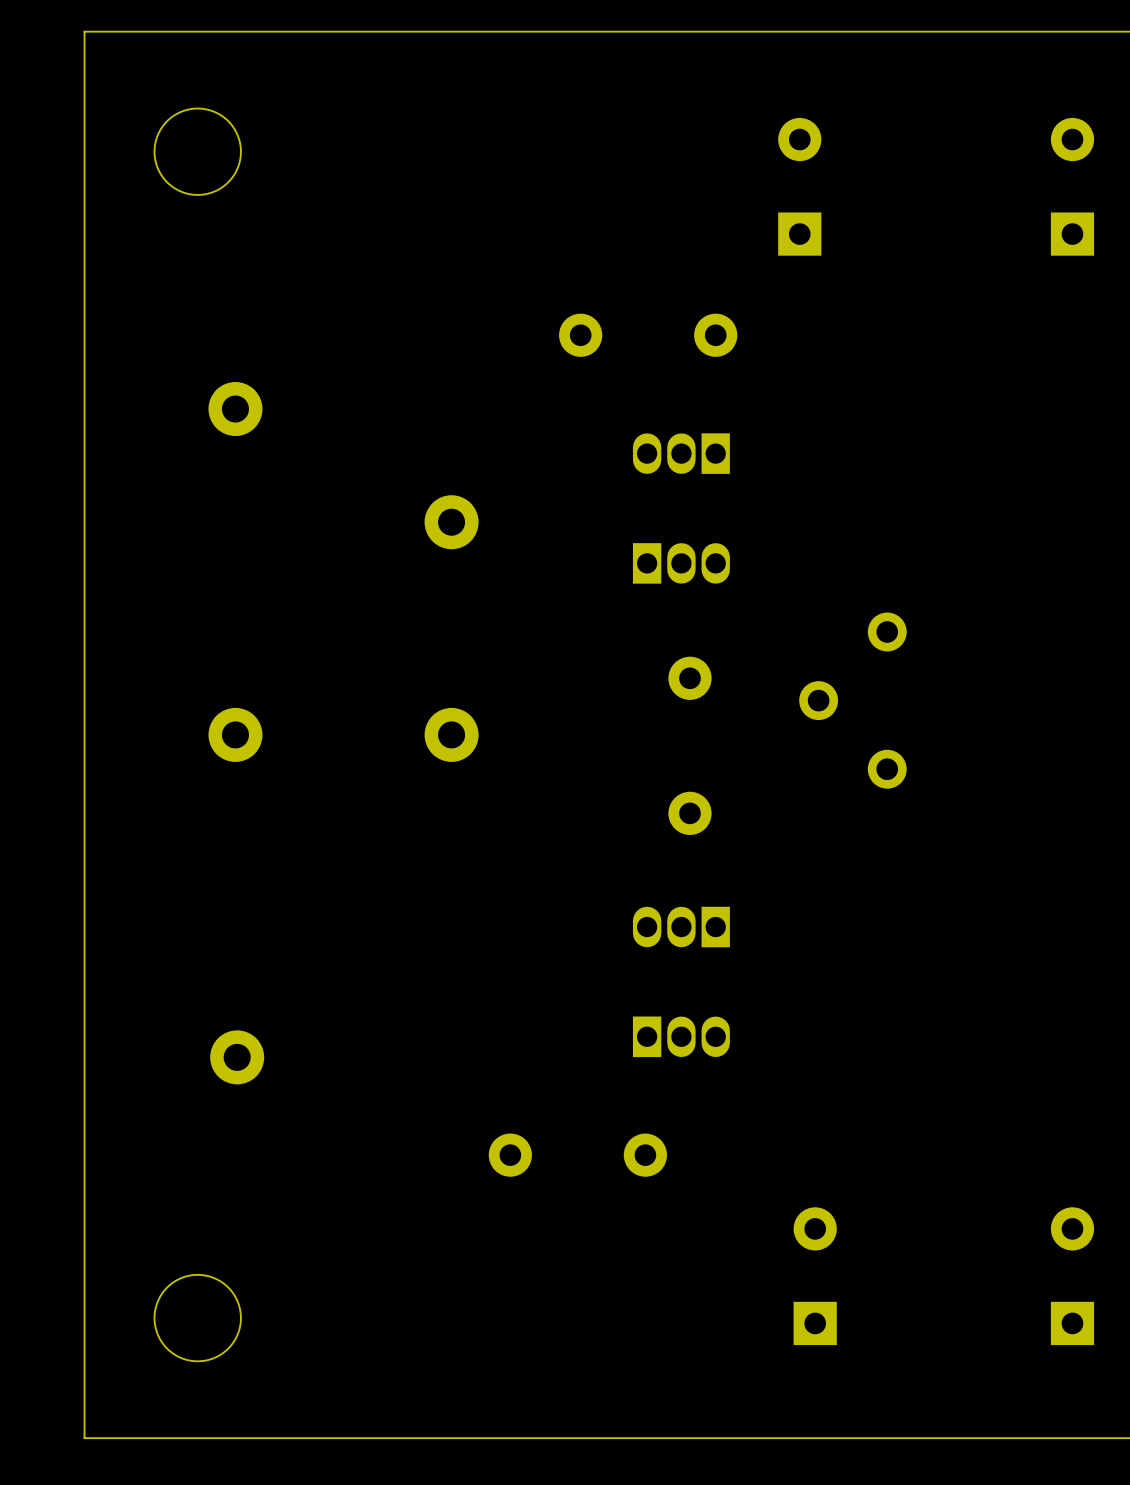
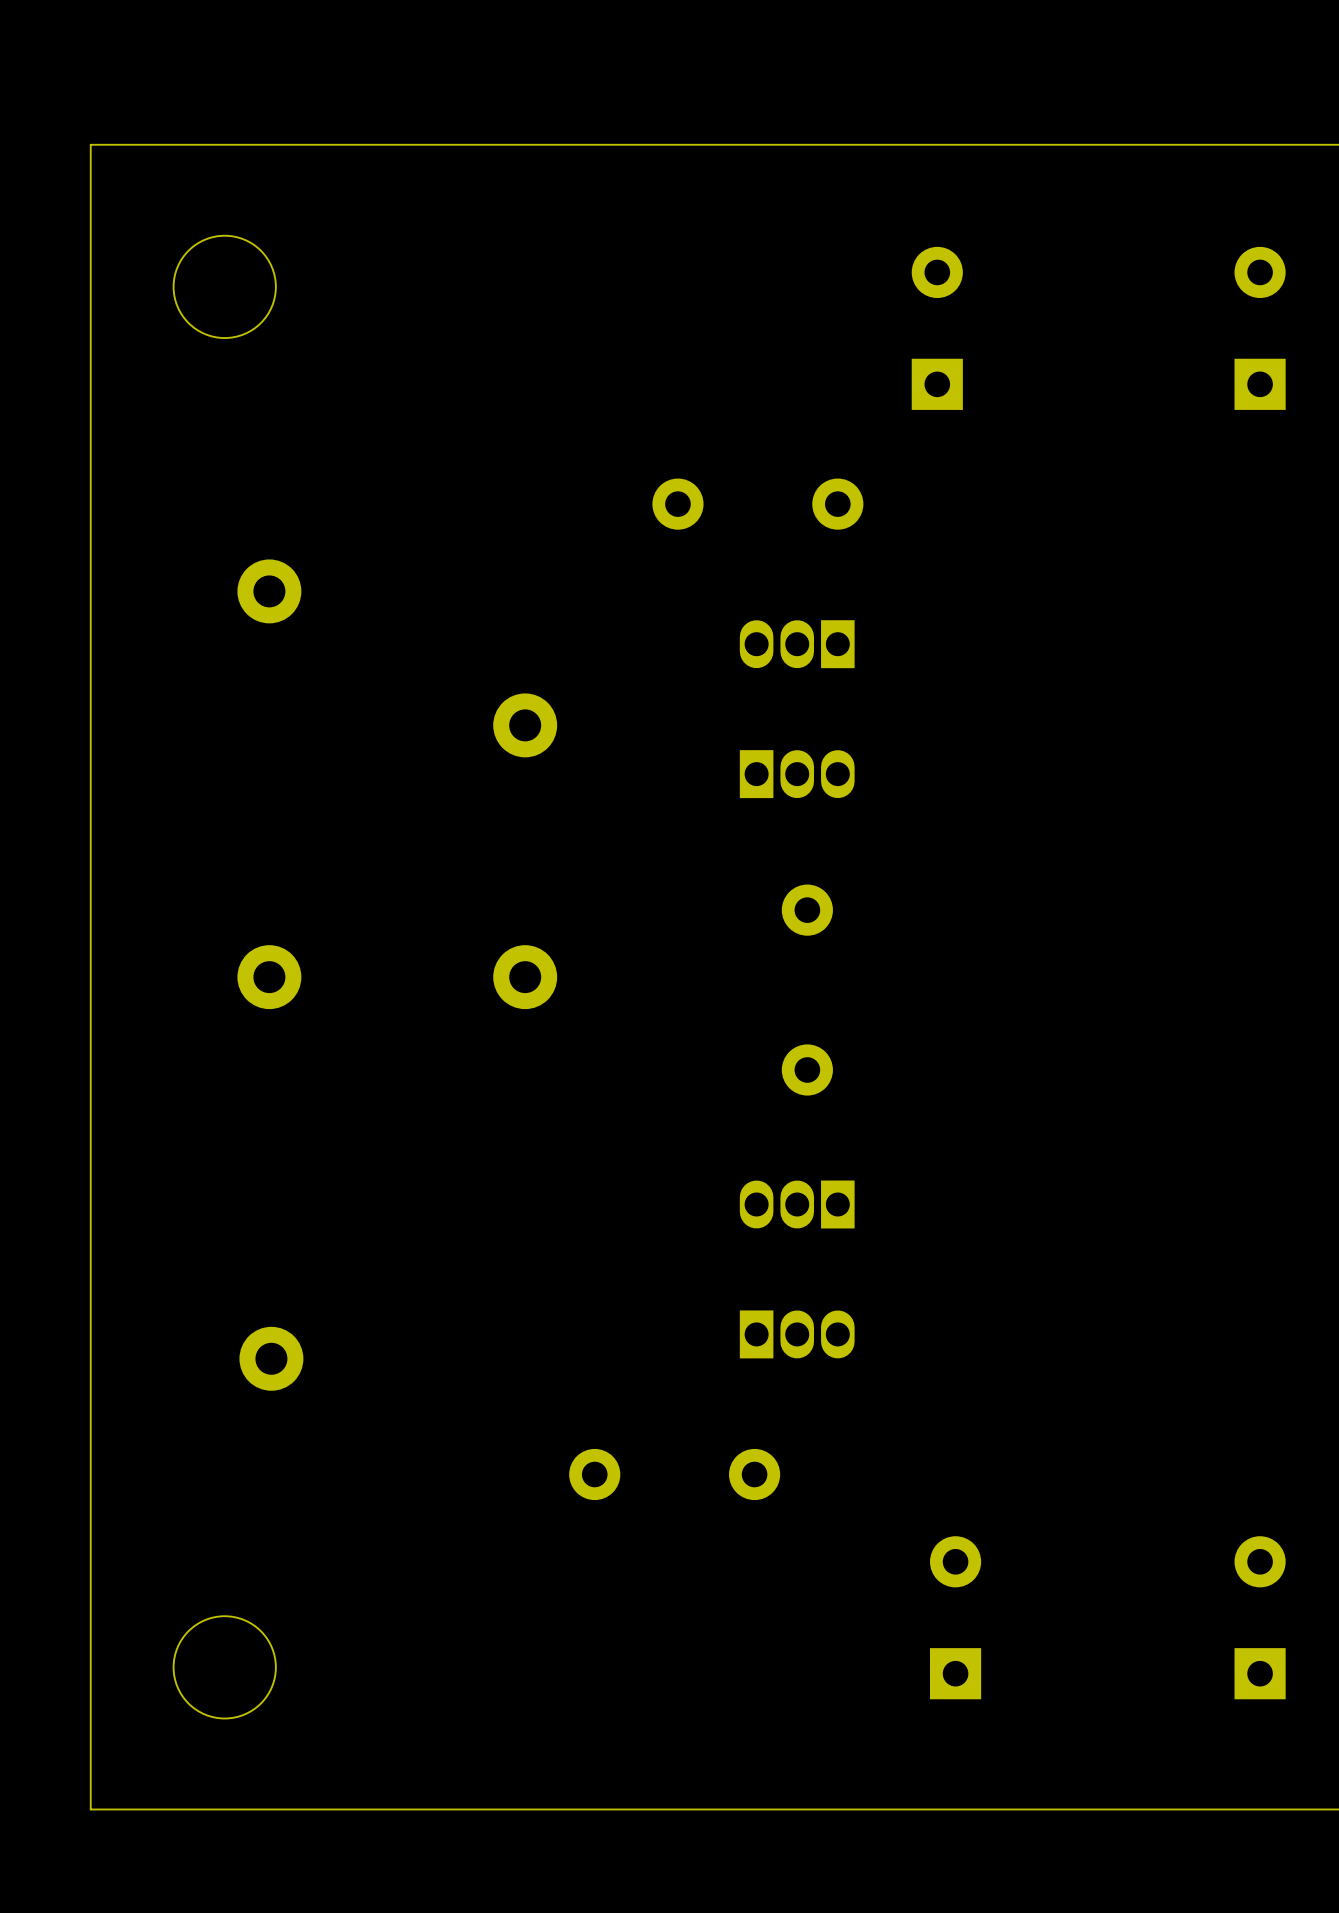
part: (852, 700) -> none

